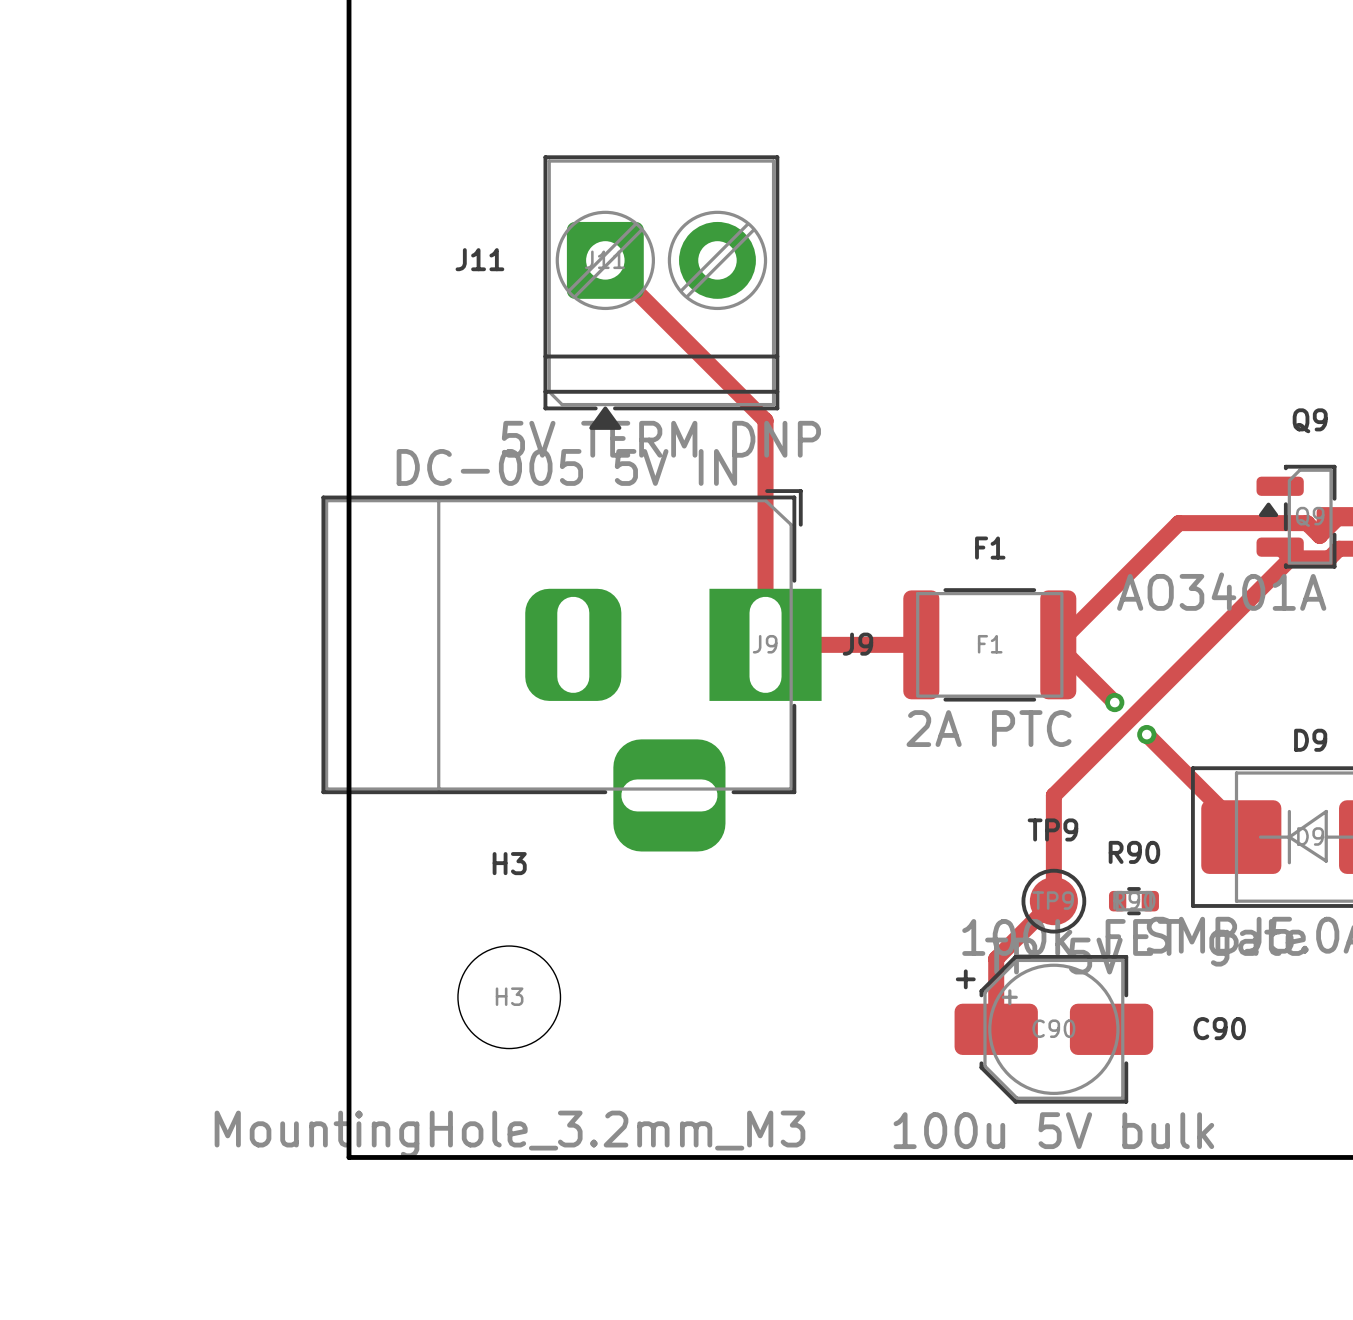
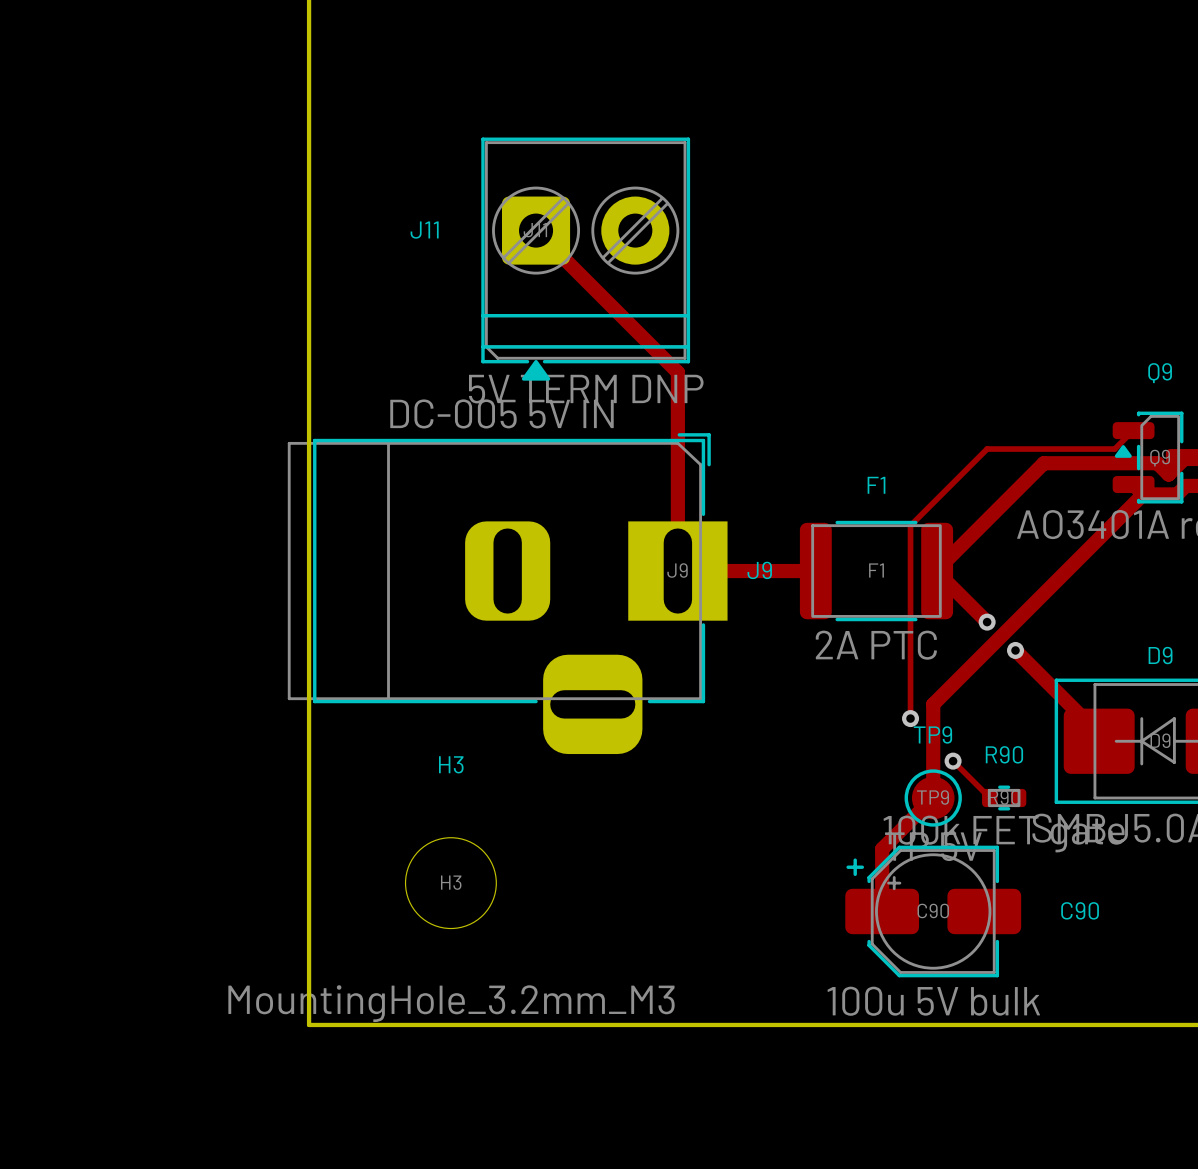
top track: none -> (1133, 430) (1134, 429) (1114, 449) (987, 449) (910, 525) (910, 718)
J9 footprint: [321, 489, 822, 852] -> [287, 433, 728, 755]
via: none -> (910, 718)
top track: none -> (953, 761) (989, 798)
via: none -> (953, 761)

